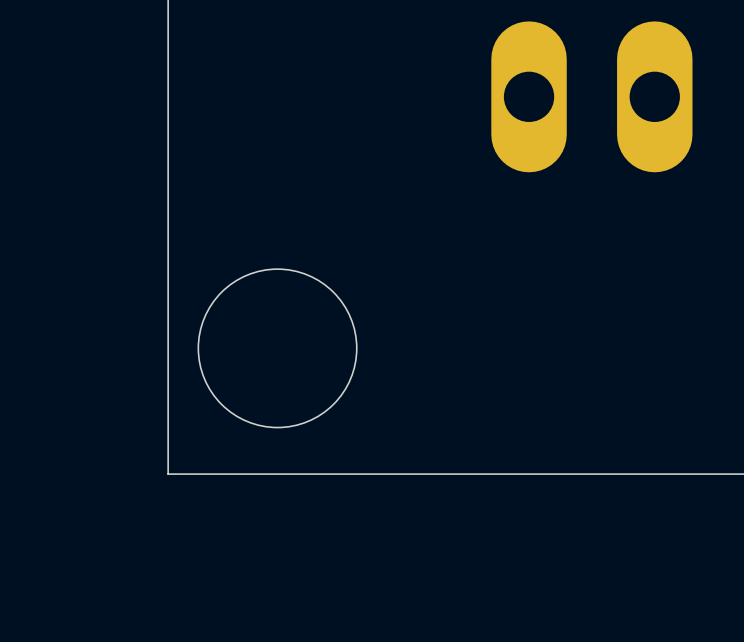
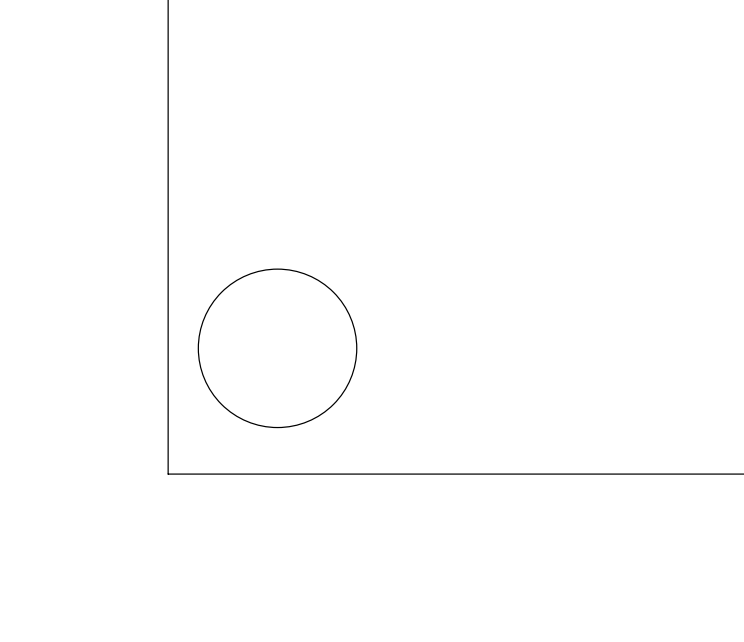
part: (591, 96) -> none

